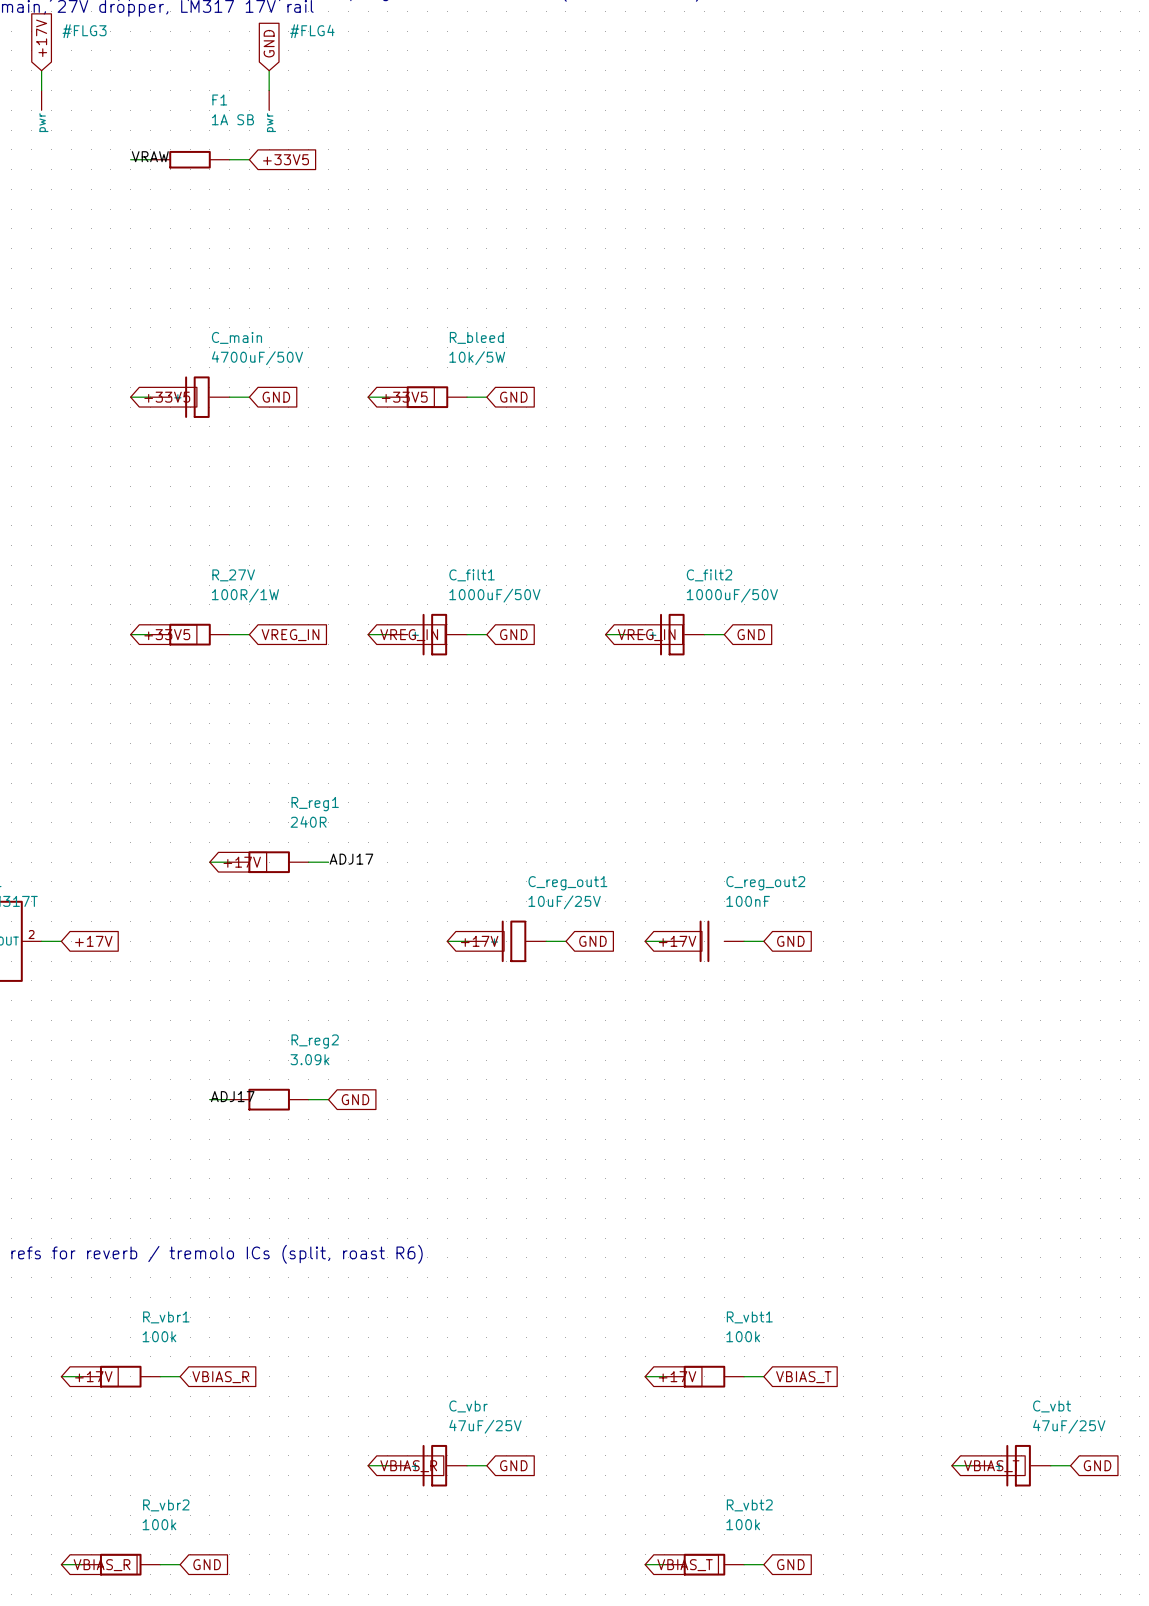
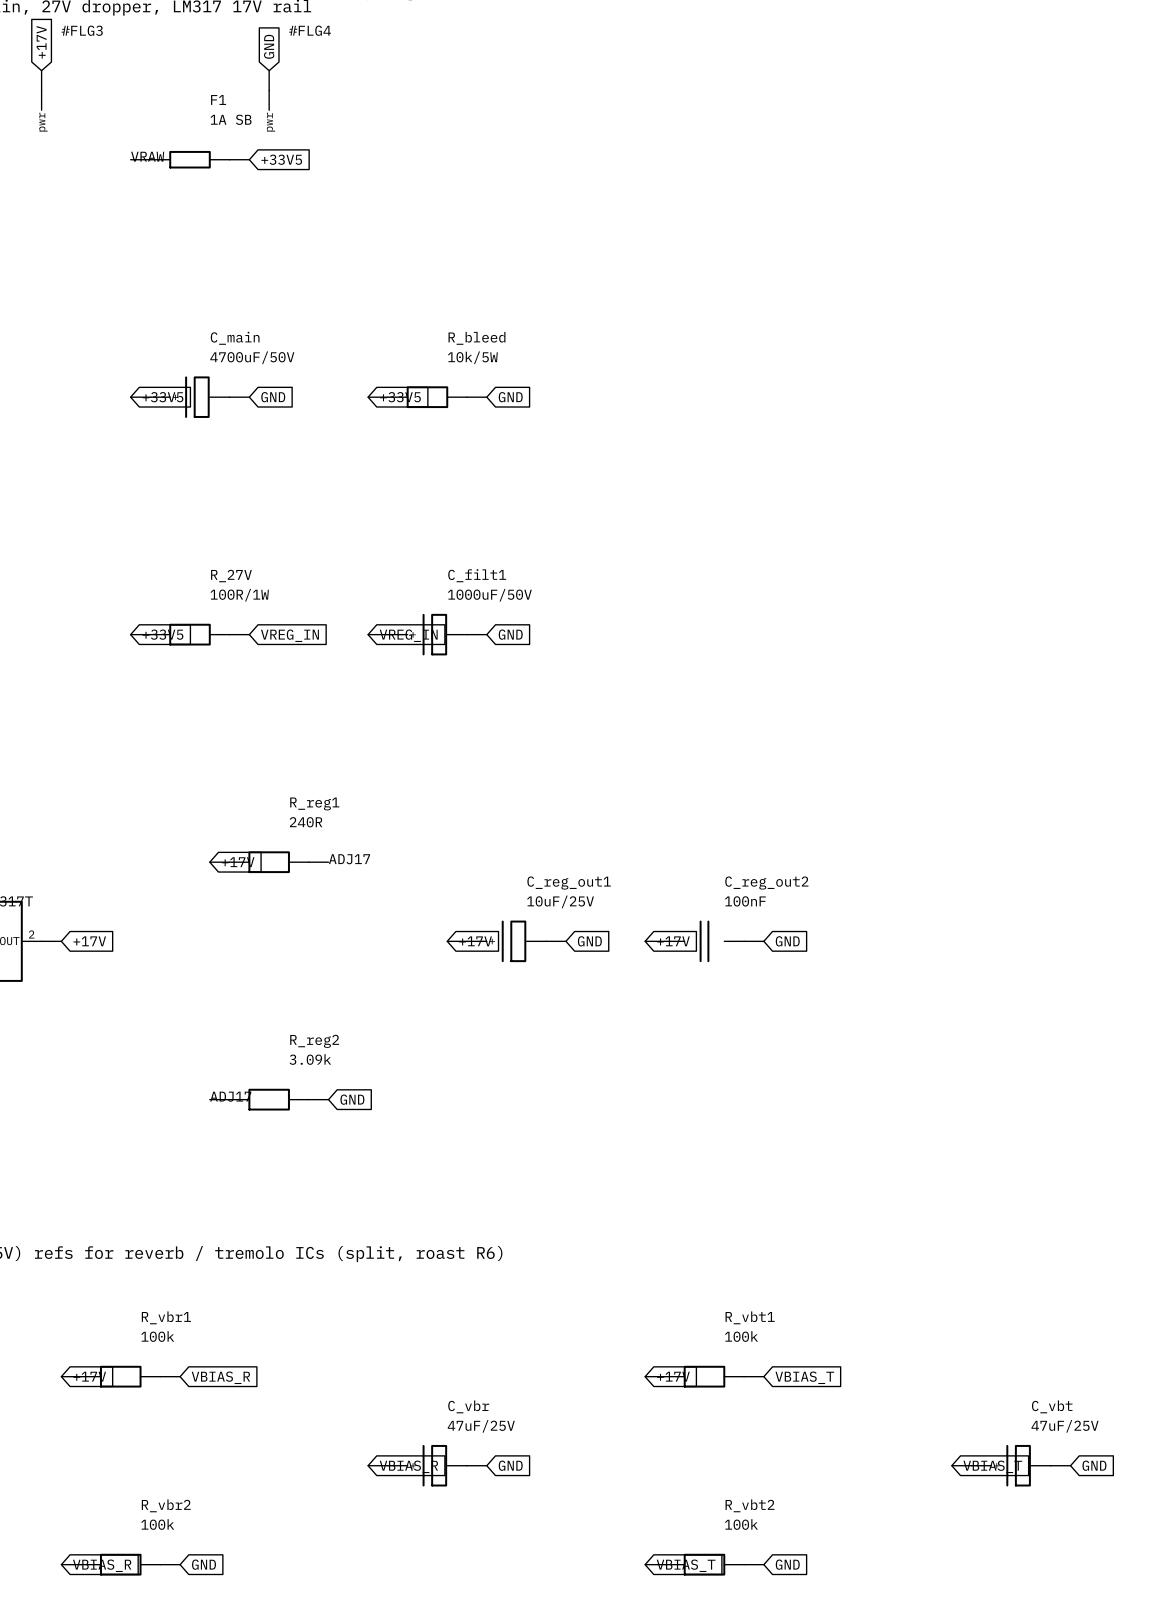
wire: (605, 634) (625, 634) -> none
C_filt2: 1000uF/50V (664, 634) -> none
wire: (704, 634) (724, 634) -> none
global label: GND (751, 634) -> none
global label: VREG_IN (646, 635) -> none

